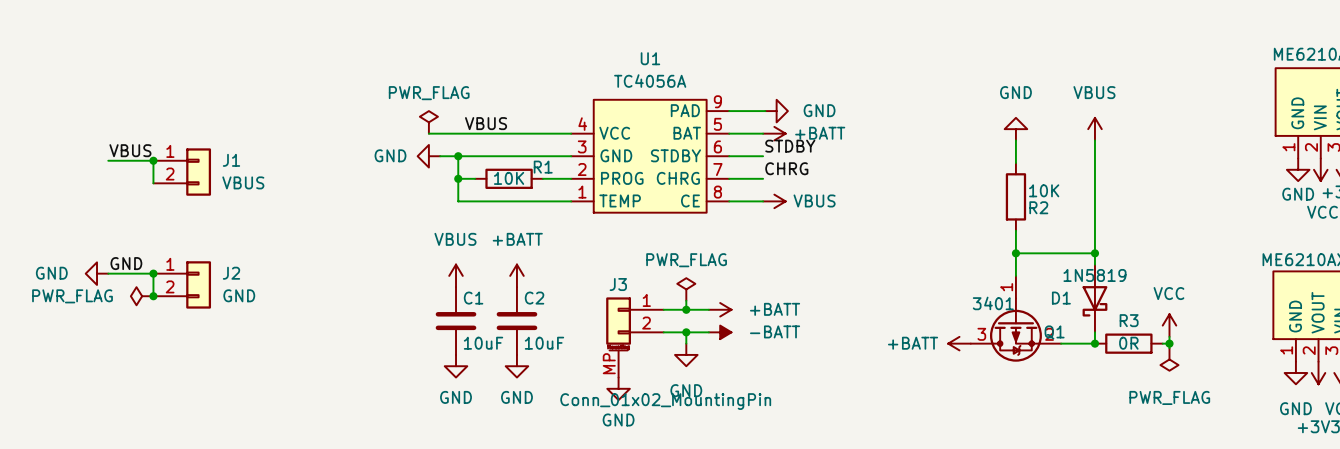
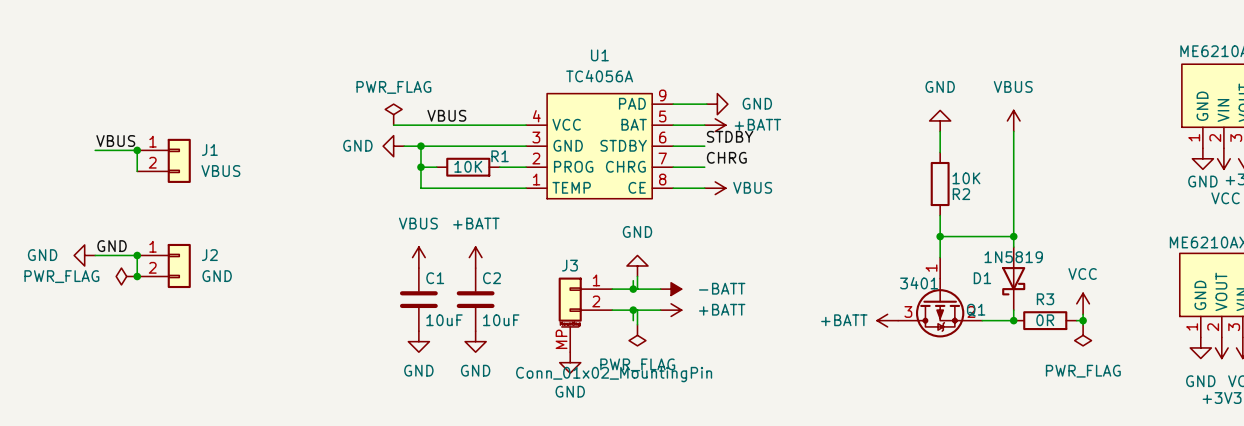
power symbol: PWR_FLAG (686, 289) -> GND (637, 265)
wire: none -> (637, 276) (637, 289)
power symbol: +BATT (720, 309) -> -BATT (671, 289)
wire: none -> (637, 310) (637, 324)
power symbol: -BATT (720, 332) -> +BATT (671, 310)
power symbol: GND (686, 354) -> PWR_FLAG (637, 335)

